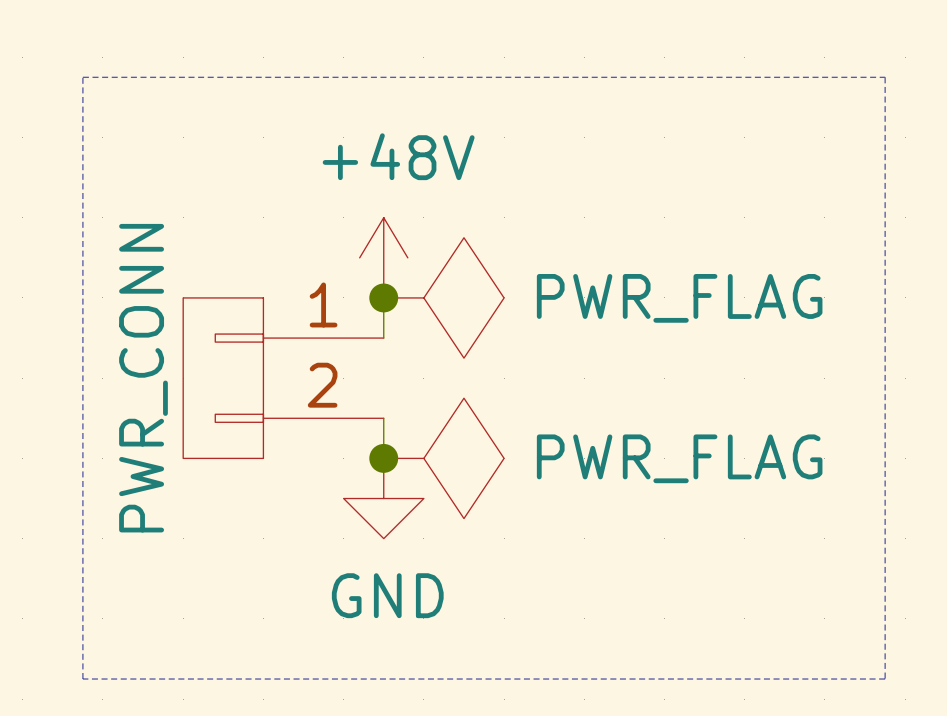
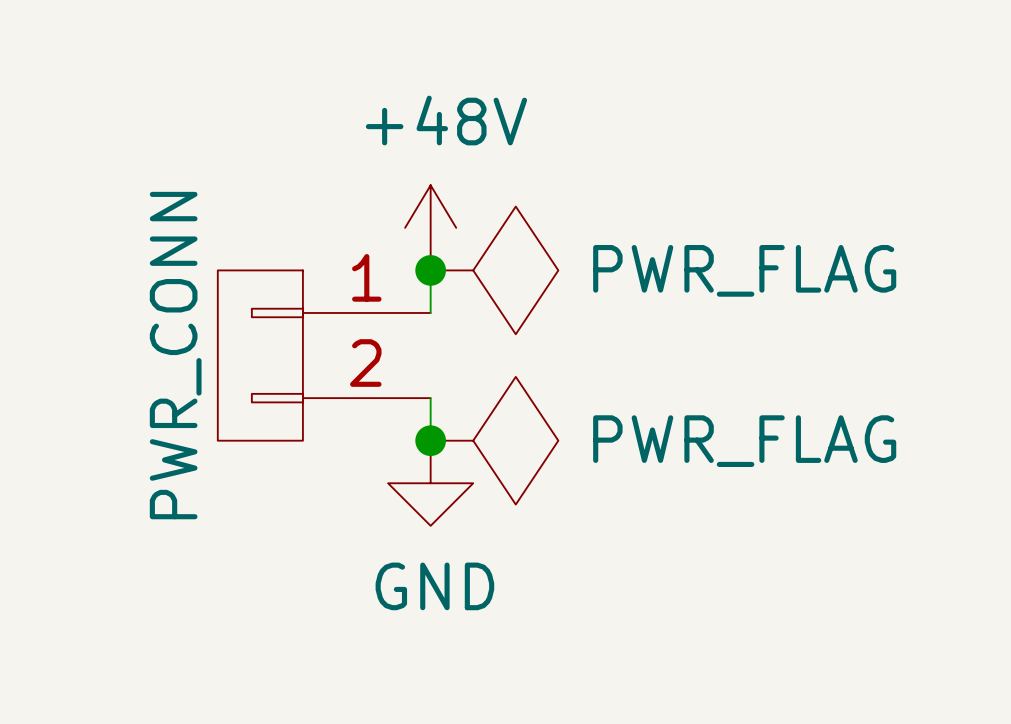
line: (82, 77) (885, 77) (885, 679) (82, 679) (82, 77) -> none

